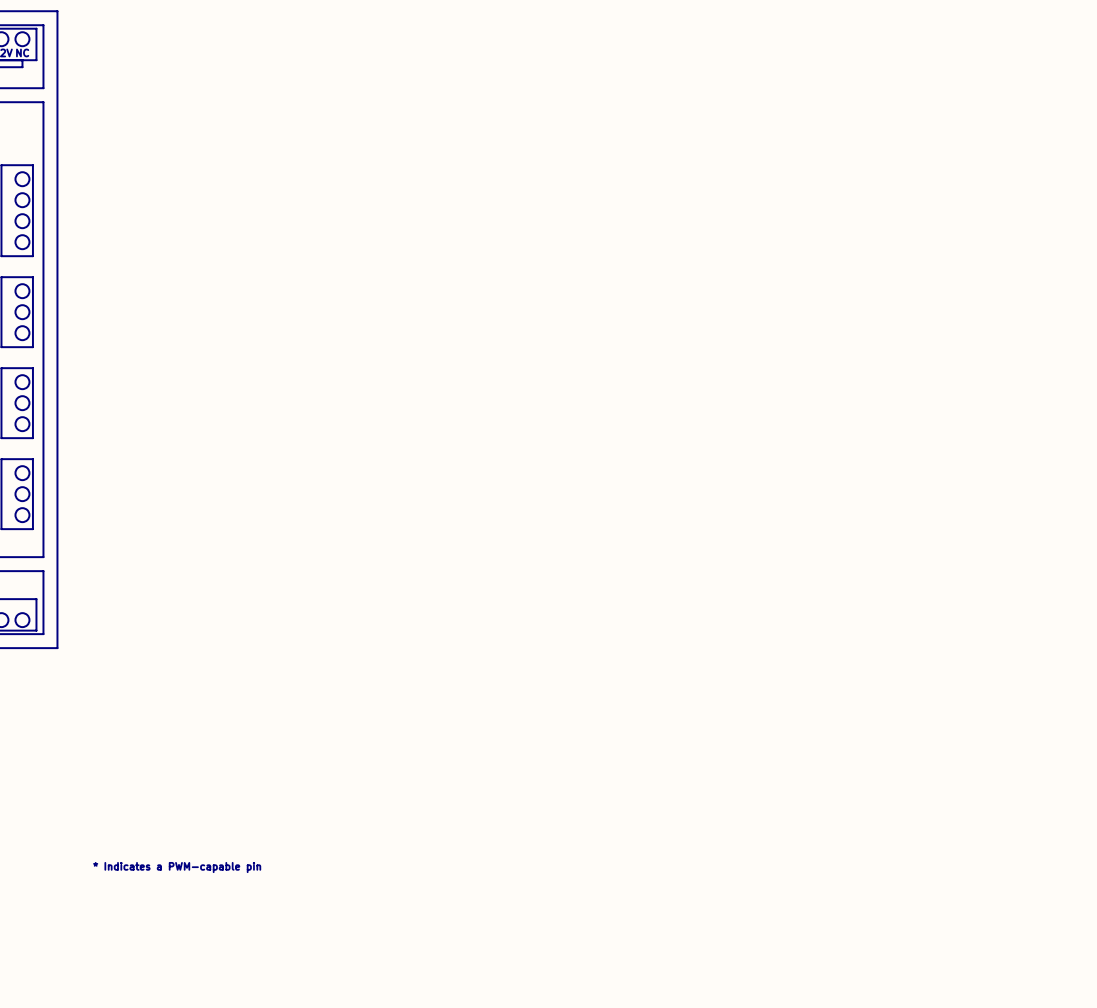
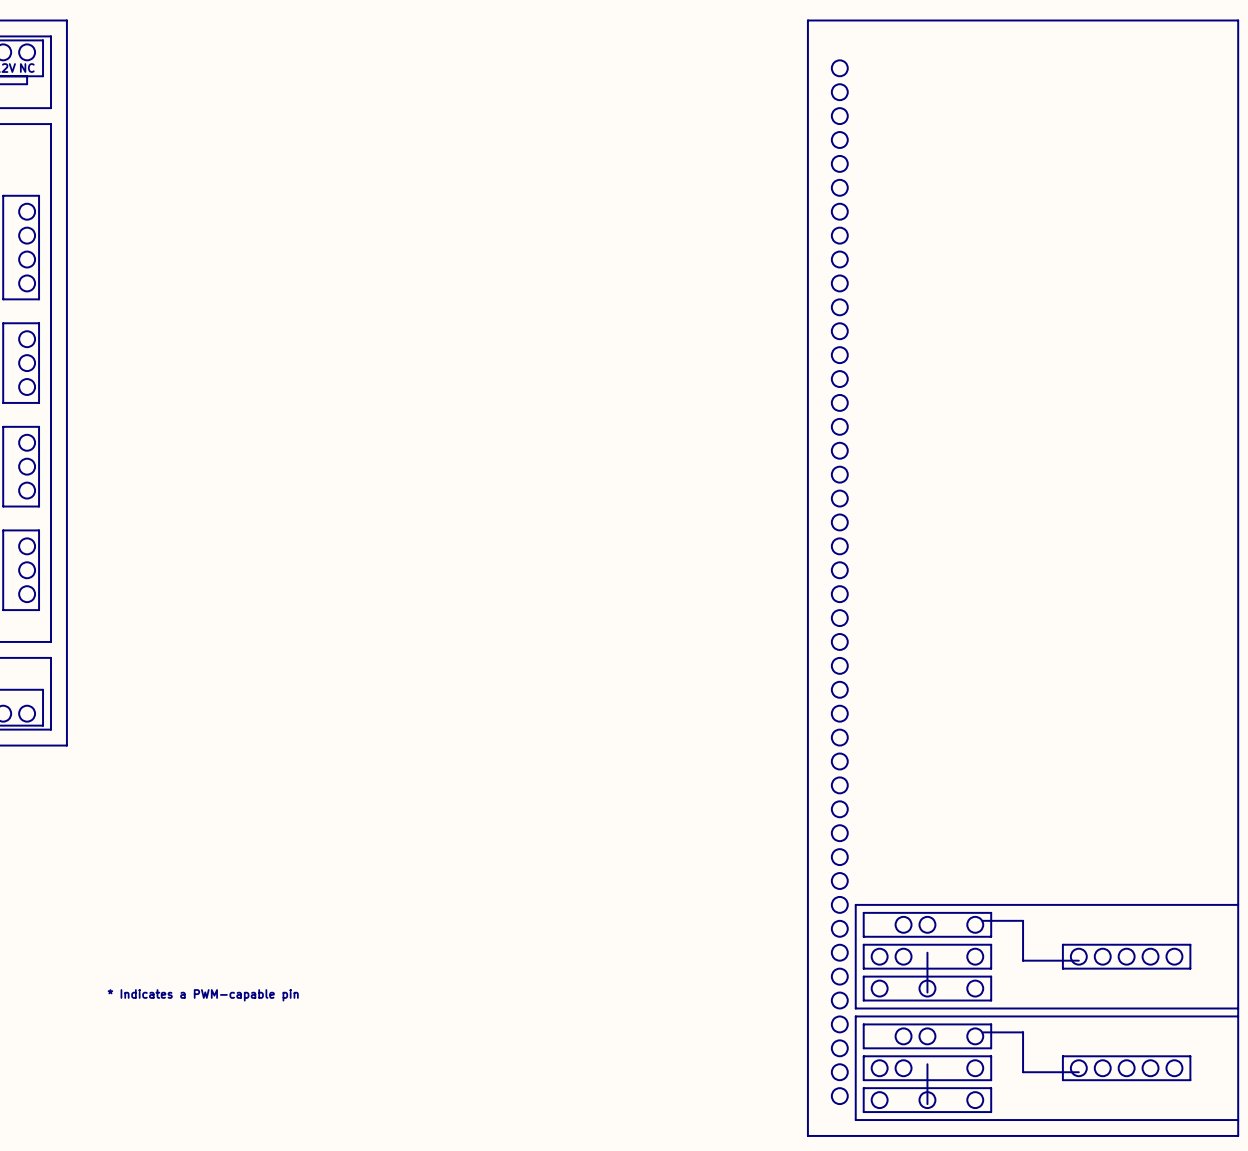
line: none -> (807, 20) (1238, 20) (1238, 1135) (807, 1135) (807, 20)
drawing: none -> [831, 60, 848, 77]
drawing: none -> [831, 84, 848, 101]
drawing: none -> [831, 108, 848, 125]
drawing: none -> [831, 132, 848, 148]
drawing: none -> [831, 155, 848, 172]
drawing: none -> [831, 179, 848, 196]
drawing: none -> [831, 203, 848, 220]
drawing: none -> [831, 227, 848, 244]
drawing: none -> [831, 251, 848, 268]
drawing: none -> [831, 275, 848, 292]
drawing: none -> [831, 299, 848, 316]
drawing: none -> [831, 323, 848, 340]
drawing: none -> [831, 347, 848, 364]
drawing: none -> [831, 371, 848, 388]
drawing: none -> [831, 394, 848, 411]
drawing: none -> [831, 418, 848, 435]
drawing: none -> [831, 442, 848, 459]
drawing: none -> [831, 466, 848, 483]
drawing: none -> [831, 490, 848, 507]
drawing: none -> [831, 514, 848, 531]
drawing: none -> [831, 538, 848, 555]
drawing: none -> [831, 562, 848, 579]
drawing: none -> [831, 586, 848, 603]
drawing: none -> [831, 610, 848, 627]
drawing: none -> [831, 634, 848, 650]
drawing: none -> [831, 657, 848, 674]
drawing: none -> [831, 681, 848, 698]
drawing: none -> [831, 705, 848, 722]
drawing: none -> [831, 729, 848, 746]
drawing: none -> [831, 753, 848, 770]
drawing: none -> [831, 777, 848, 794]
drawing: none -> [831, 801, 848, 818]
drawing: none -> [831, 825, 848, 842]
drawing: none -> [831, 849, 848, 866]
drawing: none -> [831, 873, 848, 889]
drawing: none -> [831, 896, 848, 913]
line: none -> (1238, 904) (855, 904) (855, 1008) (1238, 1008)
line: none -> (863, 912) (863, 936) (991, 936) (991, 912) (863, 912)
drawing: none -> [895, 916, 912, 933]
drawing: none -> [919, 916, 936, 933]
drawing: none -> [967, 916, 984, 933]
drawing: none -> [831, 920, 848, 937]
wire: none -> (983, 920) (1023, 920) (1023, 960) (1078, 960)
drawing: none -> [831, 944, 848, 961]
line: none -> (863, 944) (863, 968) (991, 968) (991, 944) (863, 944)
line: none -> (1062, 944) (1190, 944) (1190, 968) (1062, 968) (1062, 944)
drawing: none -> [871, 948, 888, 965]
drawing: none -> [895, 948, 912, 965]
drawing: none -> [967, 948, 984, 965]
drawing: none -> [1070, 948, 1087, 965]
drawing: none -> [1094, 948, 1111, 965]
drawing: none -> [1118, 948, 1135, 965]
drawing: none -> [1142, 948, 1159, 965]
drawing: none -> [1166, 948, 1183, 965]
wire: none -> (927, 952) (927, 992)
drawing: none -> [831, 968, 848, 985]
line: none -> (863, 976) (863, 1000) (991, 1000) (991, 976) (863, 976)
drawing: none -> [871, 980, 888, 997]
drawing: none -> [919, 980, 936, 997]
drawing: none -> [967, 980, 984, 997]
drawing: none -> [831, 992, 848, 1009]
drawing: none -> [831, 1016, 848, 1033]
line: none -> (1238, 1016) (855, 1016) (855, 1120) (1238, 1120)
line: none -> (863, 1024) (991, 1024) (991, 1048) (863, 1048) (863, 1024)
drawing: none -> [895, 1028, 912, 1045]
drawing: none -> [919, 1028, 936, 1045]
drawing: none -> [967, 1028, 984, 1045]
wire: none -> (983, 1032) (1023, 1032) (1023, 1072) (1078, 1072)
drawing: none -> [831, 1040, 848, 1057]
line: none -> (863, 1056) (863, 1080) (991, 1080) (991, 1056) (863, 1056)
line: none -> (1062, 1056) (1062, 1080) (1190, 1080) (1190, 1056) (1062, 1056)
drawing: none -> [871, 1060, 888, 1077]
drawing: none -> [895, 1060, 912, 1077]
drawing: none -> [967, 1060, 984, 1077]
drawing: none -> [1070, 1060, 1087, 1077]
drawing: none -> [1094, 1060, 1111, 1077]
drawing: none -> [1118, 1060, 1135, 1077]
drawing: none -> [1142, 1060, 1159, 1077]
drawing: none -> [1166, 1060, 1183, 1077]
drawing: none -> [831, 1064, 848, 1081]
wire: none -> (927, 1064) (927, 1104)
drawing: none -> [831, 1088, 848, 1105]
line: none -> (863, 1088) (863, 1112) (991, 1112) (991, 1088) (863, 1088)
drawing: none -> [871, 1092, 888, 1109]
drawing: none -> [919, 1092, 936, 1109]
drawing: none -> [967, 1092, 984, 1109]

